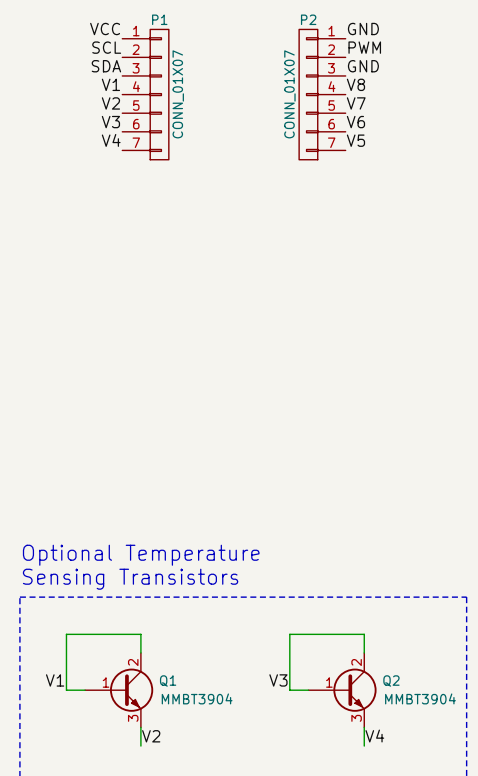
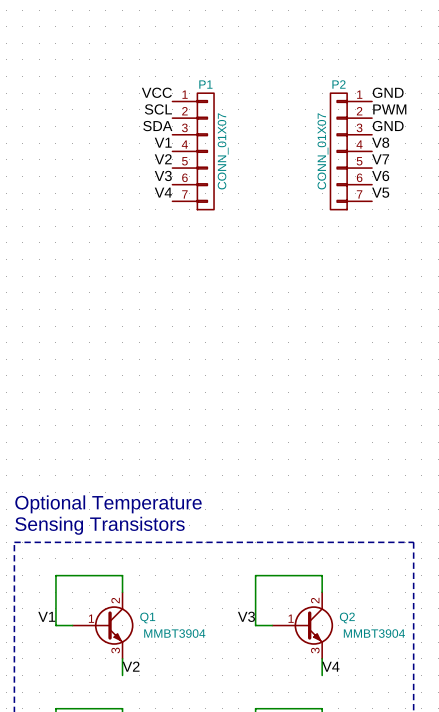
label position: VCC (105, 29) -> VCC (156, 92)
label: GND (363, 29) -> none
label position: SCL (106, 47) -> SCL (158, 109)
label position: PWM (364, 47) -> PWM (389, 109)
label position: SDA (106, 66) -> SDA (157, 126)
label: GND (363, 66) -> none
label position: V1 (110, 84) -> V1 (163, 142)
label position: V8 (355, 84) -> V8 (380, 142)
P1 position: (145, 94) -> (193, 151)
P2 position: (322, 94) -> (351, 151)
label: none -> GND (388, 92)
label position: V2 (110, 103) -> V2 (163, 159)
label position: V7 (356, 103) -> V7 (380, 159)
label position: V3 (110, 122) -> V3 (163, 175)
label position: V6 (355, 122) -> V6 (380, 175)
label: none -> GND (388, 126)
label position: V4 (111, 140) -> V4 (163, 192)
label position: V5 (355, 140) -> V5 (380, 192)

